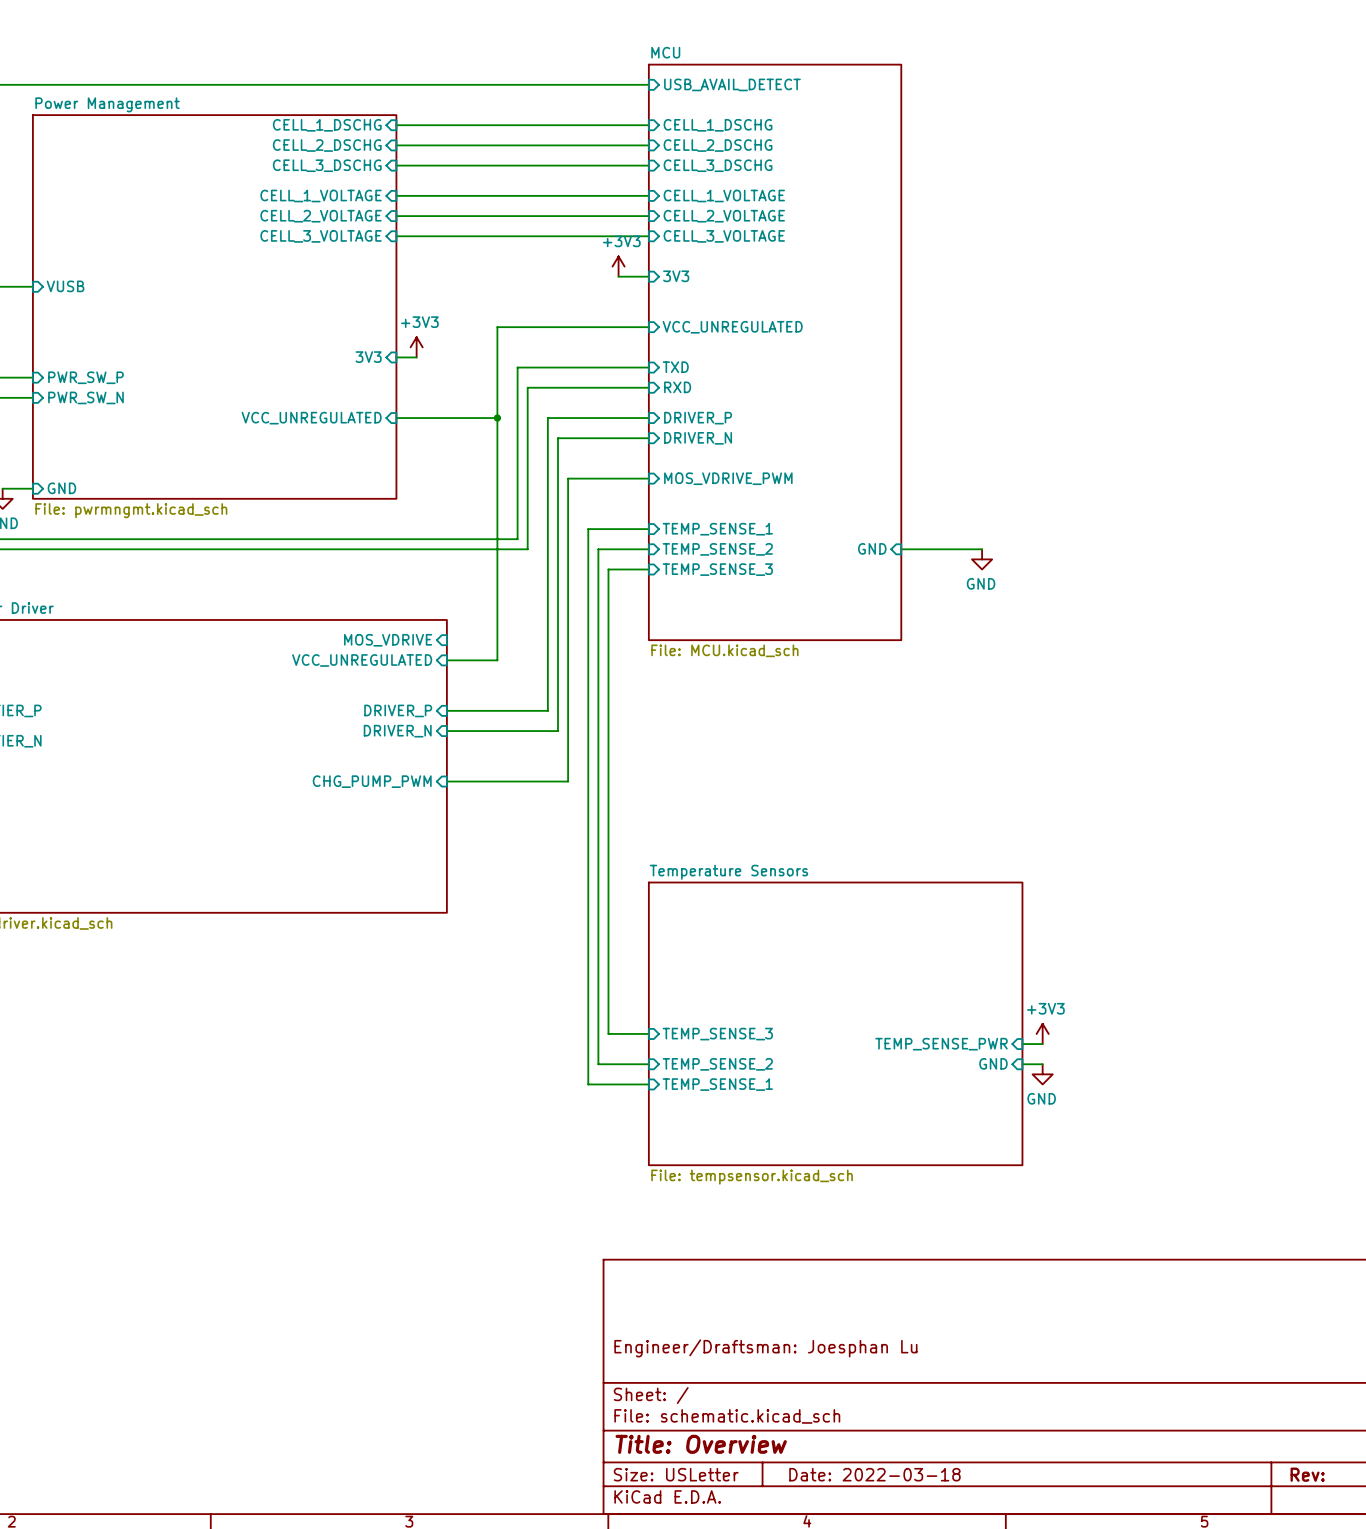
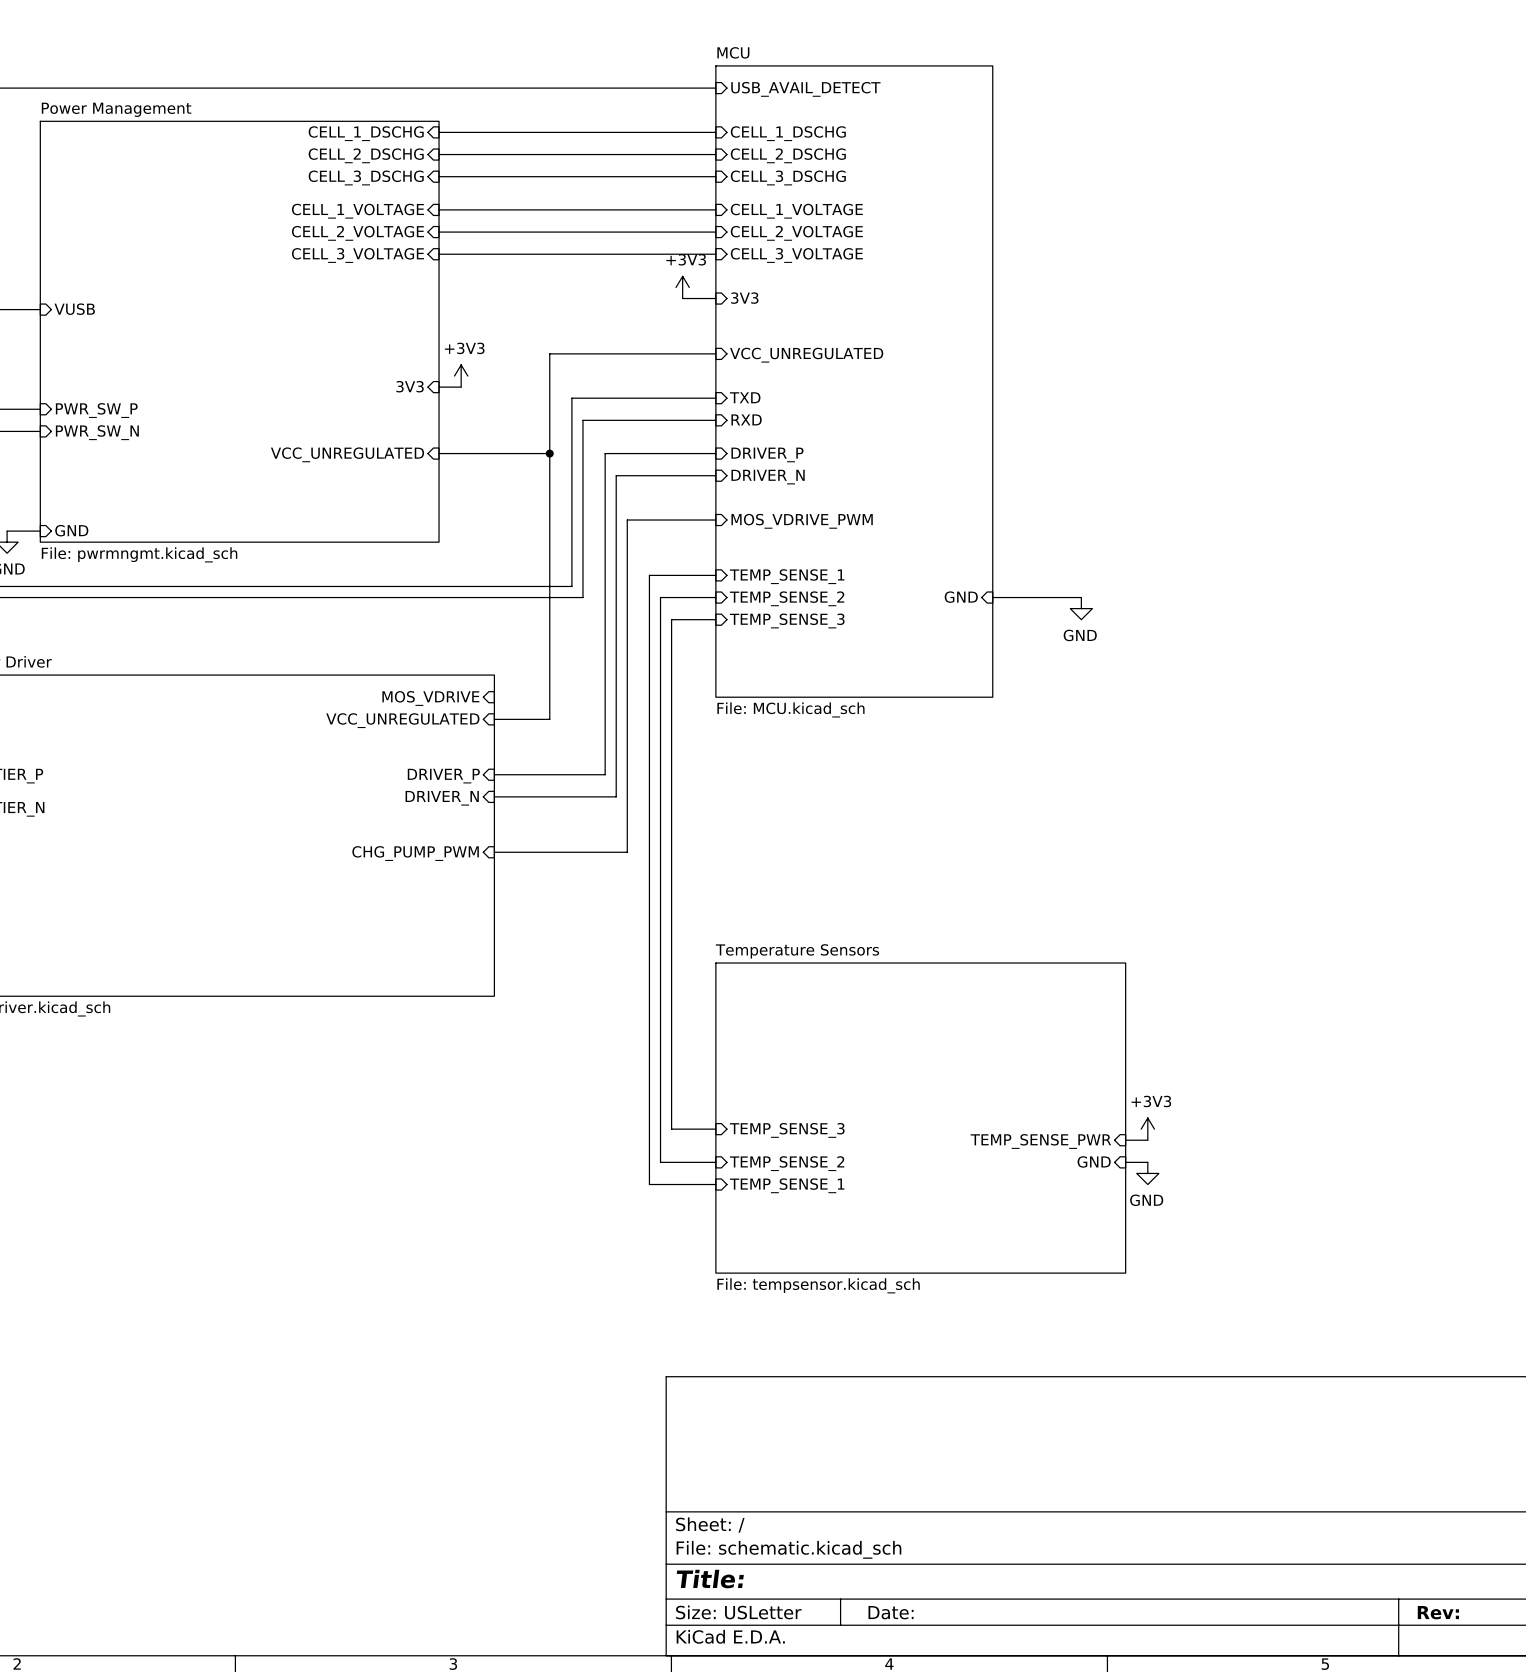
title block: Engineer/Draftsman: Joesphan Lu (765, 1348) -> none
title block: Title: Overview (701, 1444) -> Title: (710, 1579)
title block: Date: 2022-03-18 (874, 1474) -> Date: (891, 1612)

